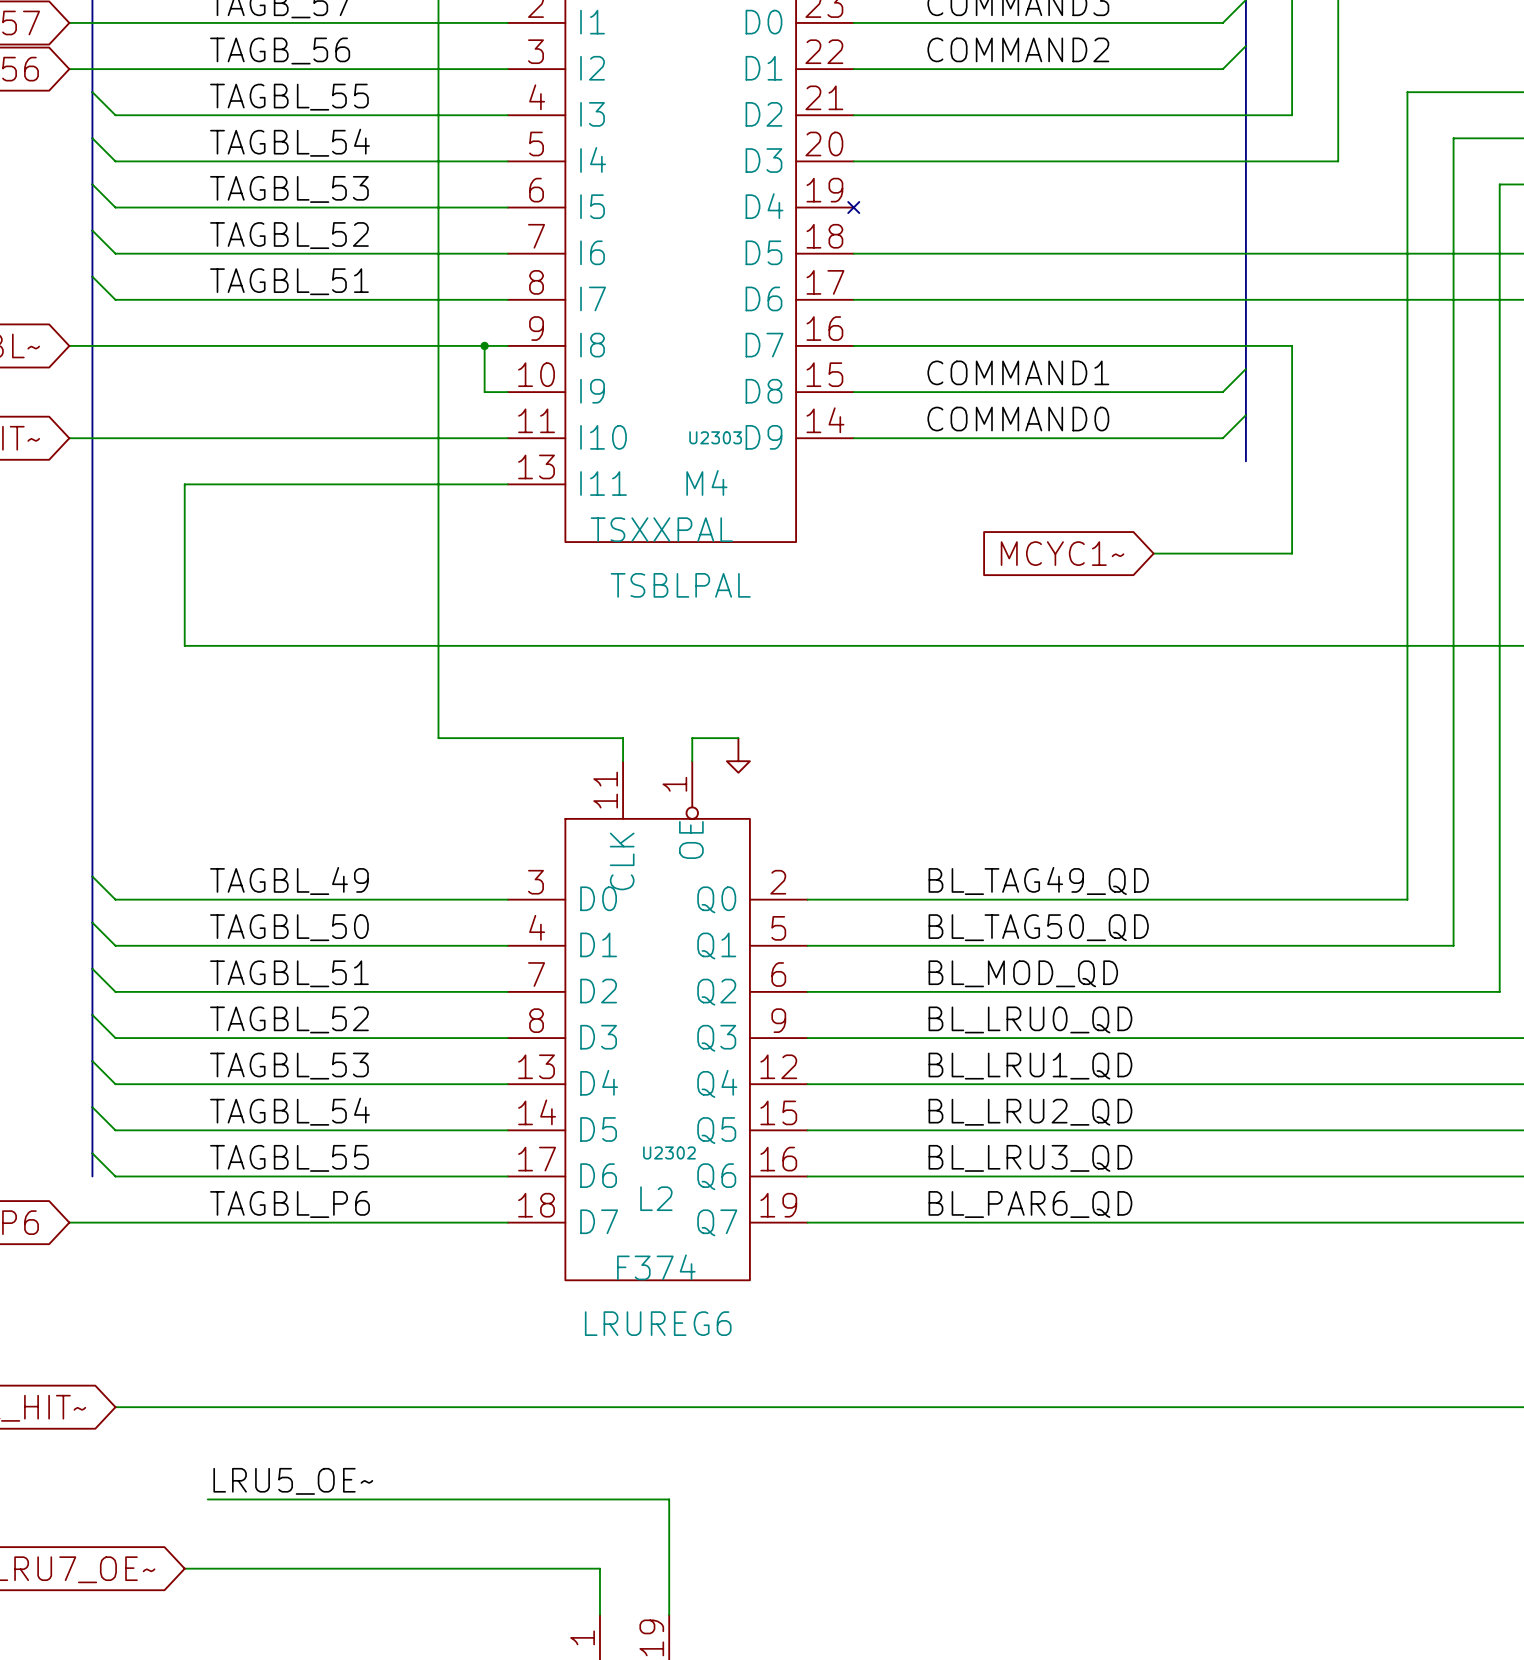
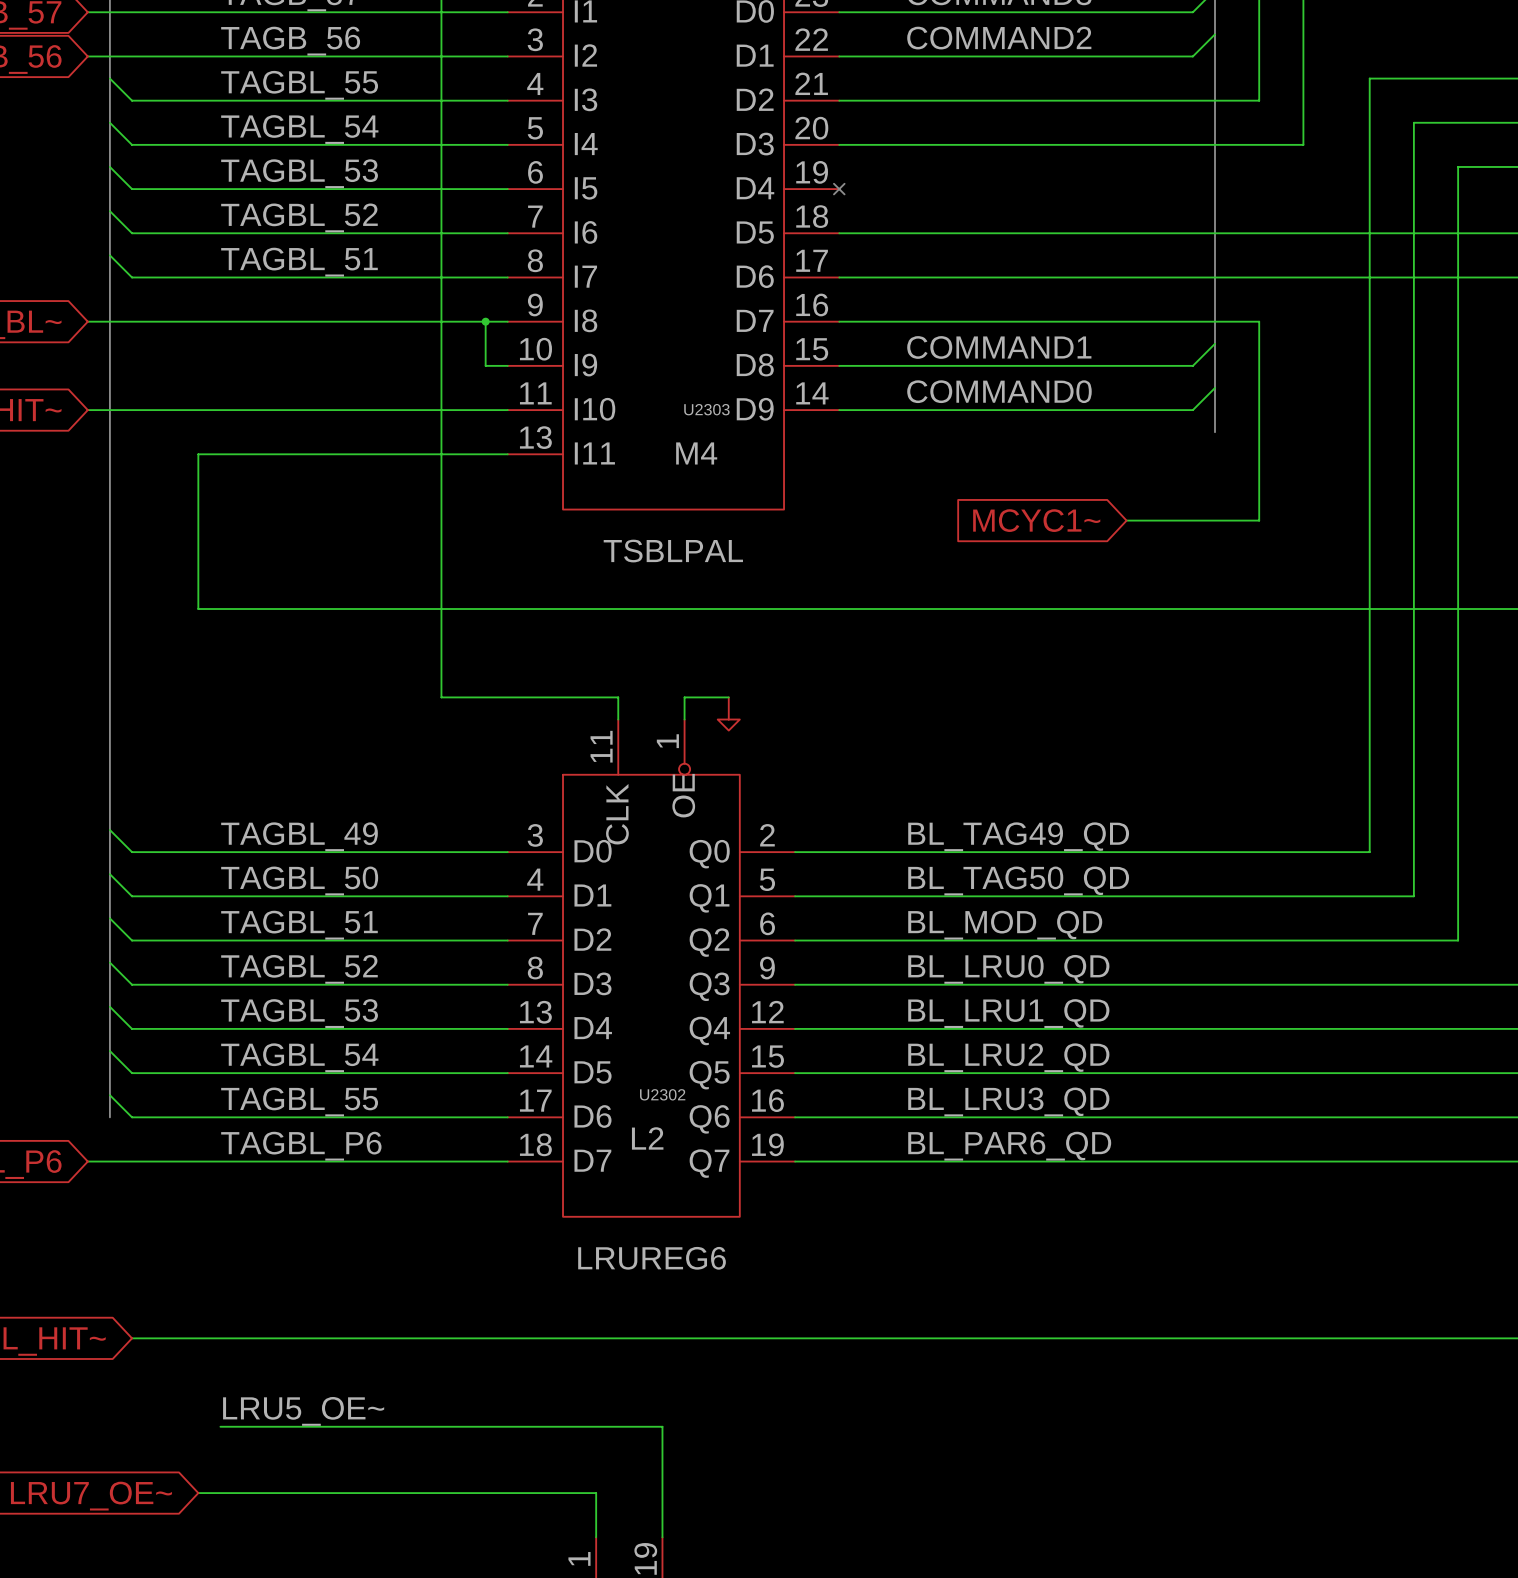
U2303 value: TSXXPAL (661, 529) -> none
U2302 value: F374 (656, 1267) -> none

